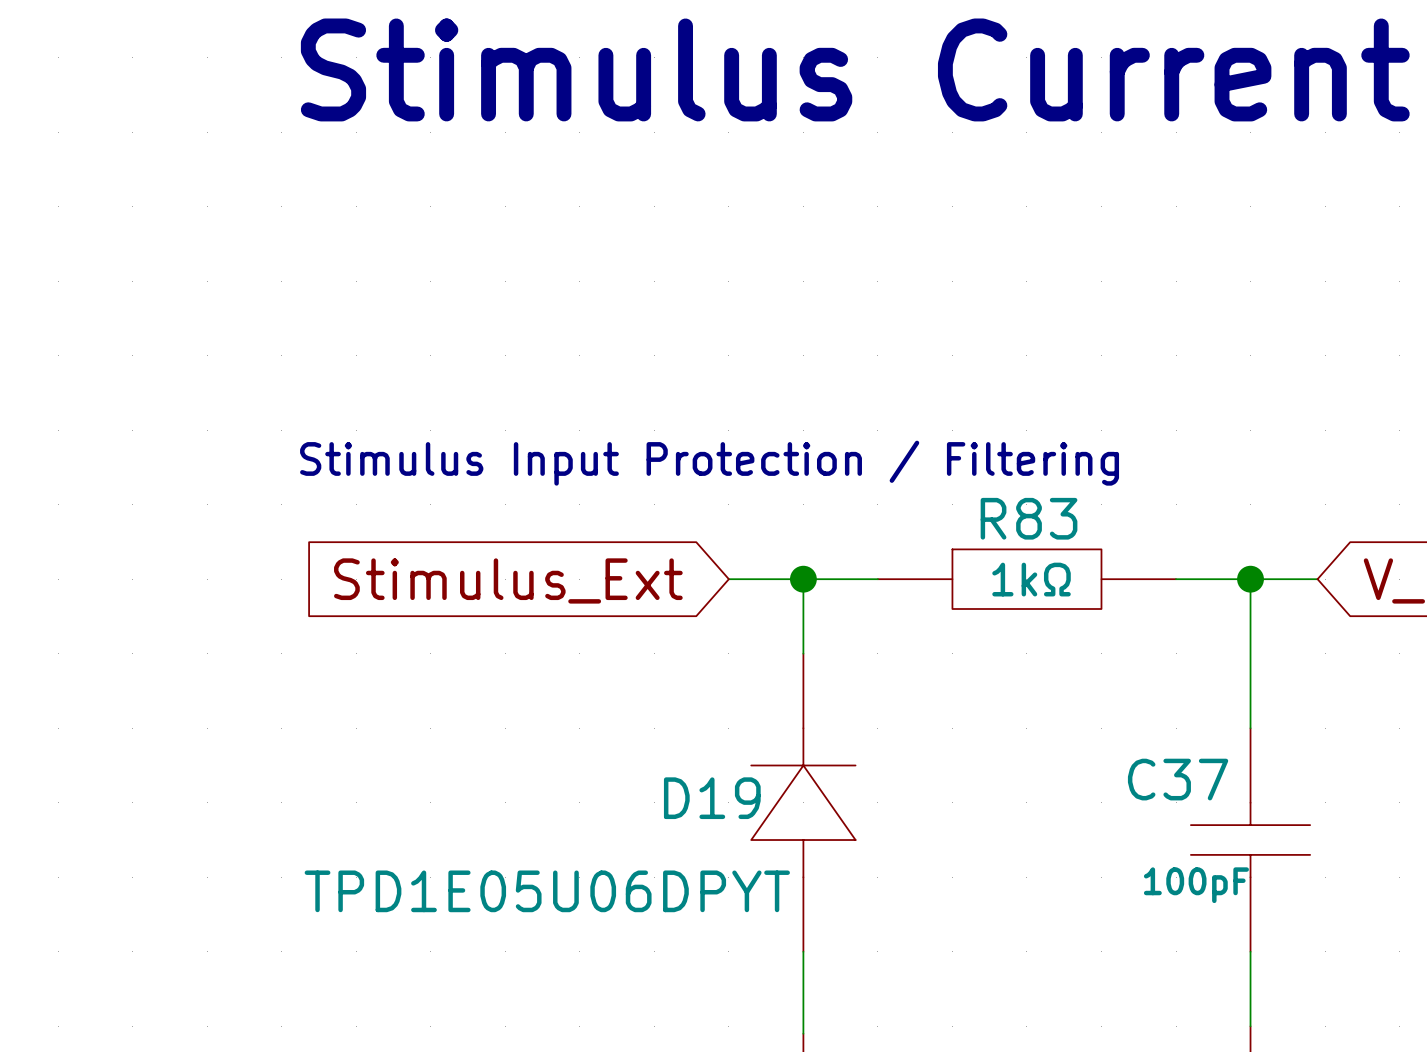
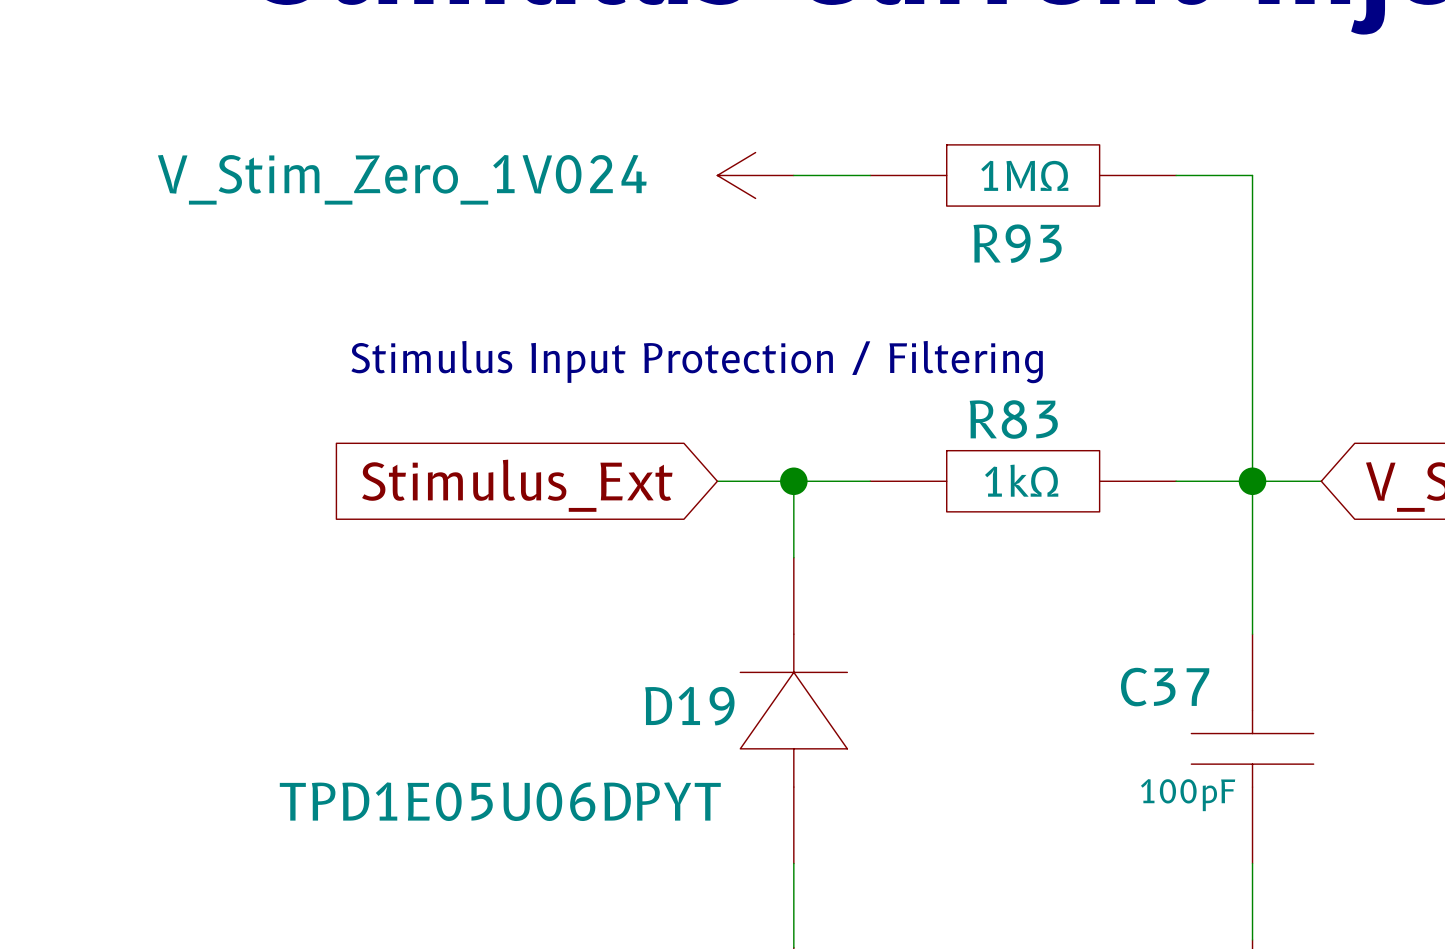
power symbol: none -> V_Stim_Zero_1V024 (755, 175)
wire: none -> (793, 175) (870, 175)
R93: none -> 1MΩ (1023, 175)
wire: none -> (1176, 175) (1252, 175) (1252, 481)

